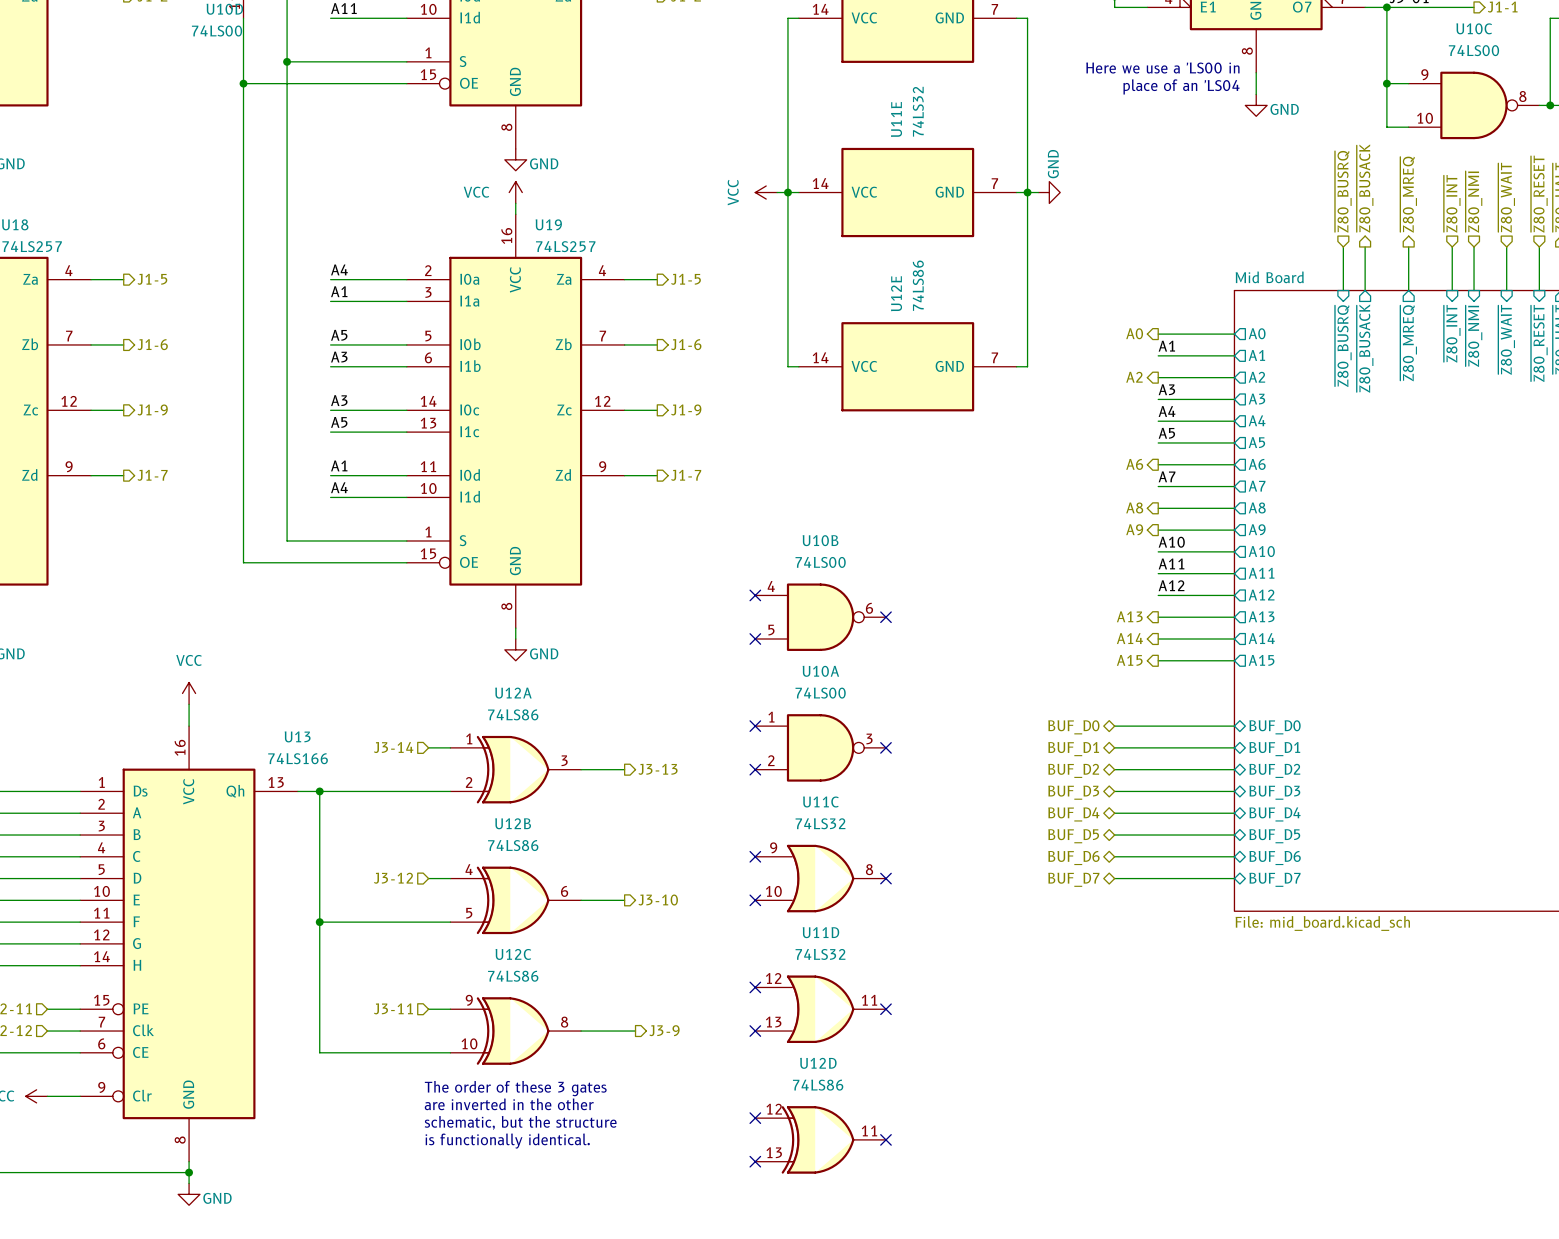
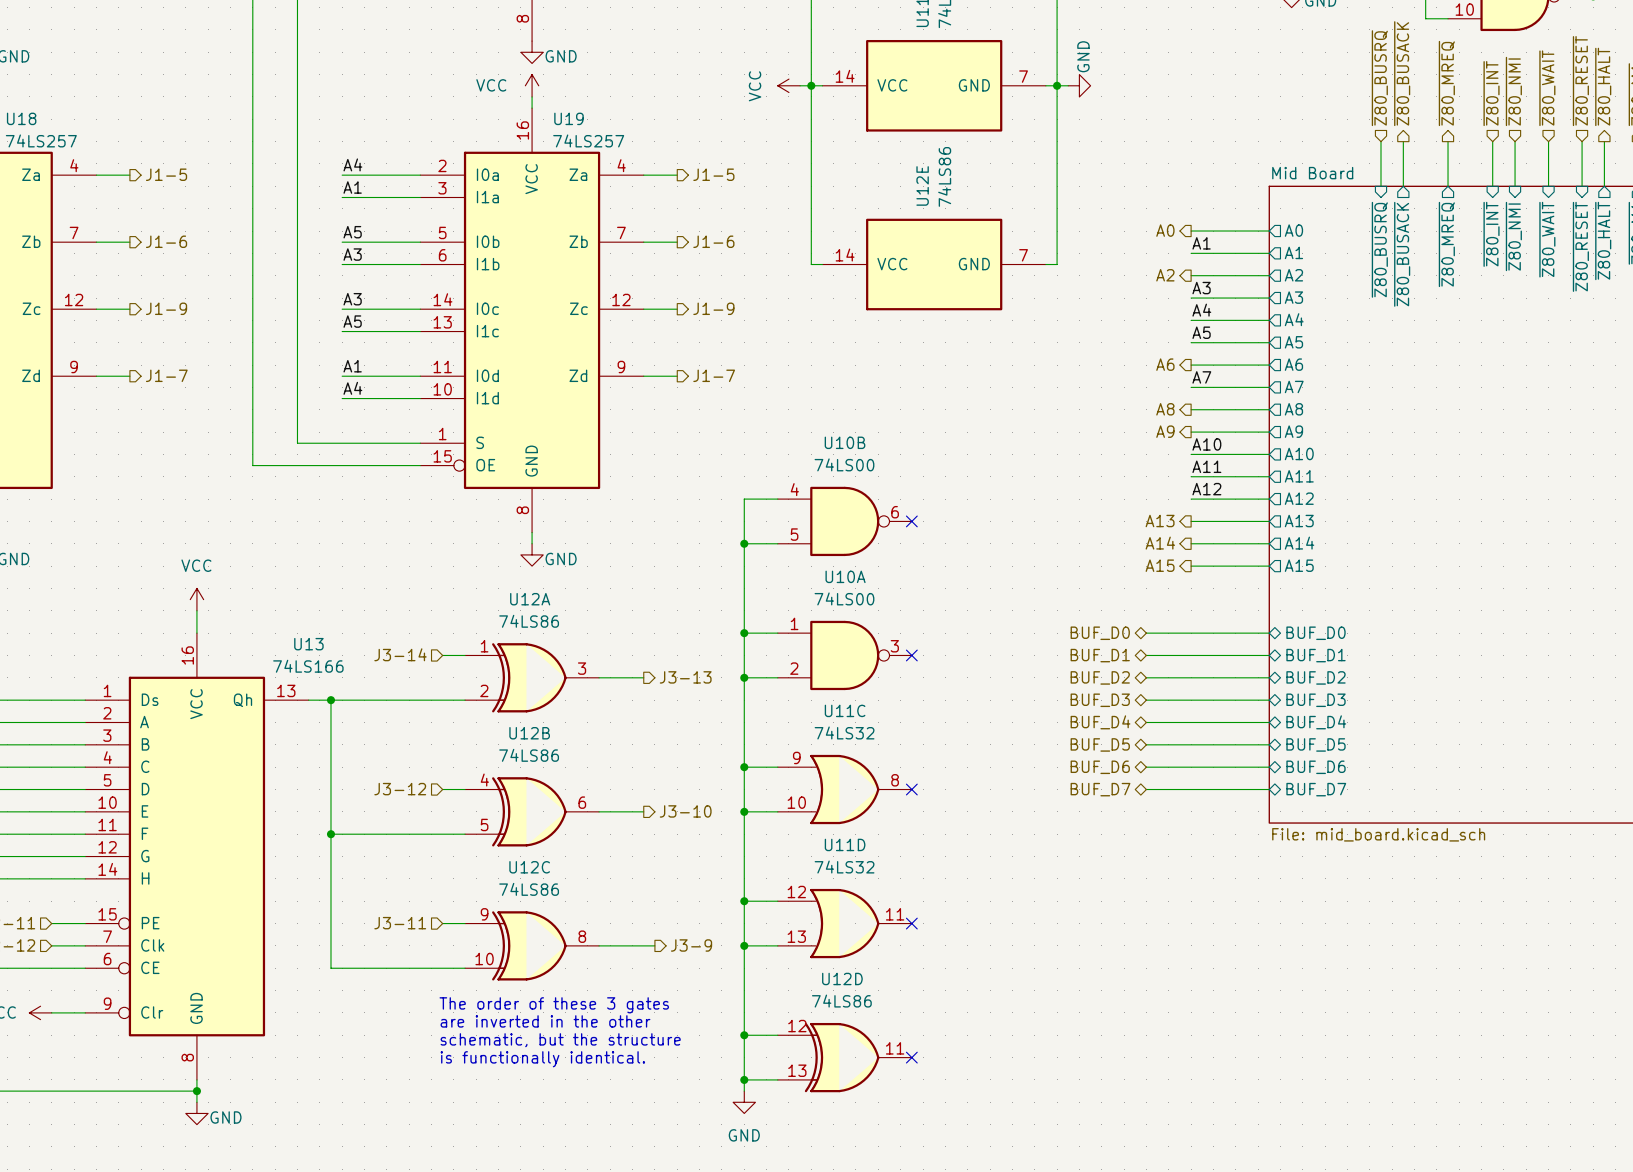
wire: none -> (777, 499) (744, 499) (744, 1091)
no-connect mark: (755, 595) -> none
wire: none -> (744, 543) (777, 543)
junction: none -> (744, 543)
no-connect mark: (755, 638) -> none
wire: none -> (744, 633) (777, 633)
junction: none -> (744, 633)
no-connect mark: (755, 726) -> none
wire: none -> (744, 677) (777, 677)
junction: none -> (744, 677)
no-connect mark: (755, 769) -> none
wire: none -> (744, 767) (777, 767)
junction: none -> (744, 767)
no-connect mark: (755, 856) -> none
wire: none -> (744, 811) (777, 811)
junction: none -> (744, 811)
no-connect mark: (755, 900) -> none
wire: none -> (744, 901) (777, 901)
junction: none -> (744, 901)
no-connect mark: (755, 987) -> none
wire: none -> (744, 945) (777, 945)
junction: none -> (744, 945)
no-connect mark: (755, 1031) -> none
wire: none -> (744, 1035) (777, 1035)
junction: none -> (744, 1035)
no-connect mark: (755, 1118) -> none
wire: none -> (744, 1079) (777, 1079)
junction: none -> (744, 1079)
no-connect mark: (755, 1161) -> none
power symbol: none -> GND (744, 1102)

